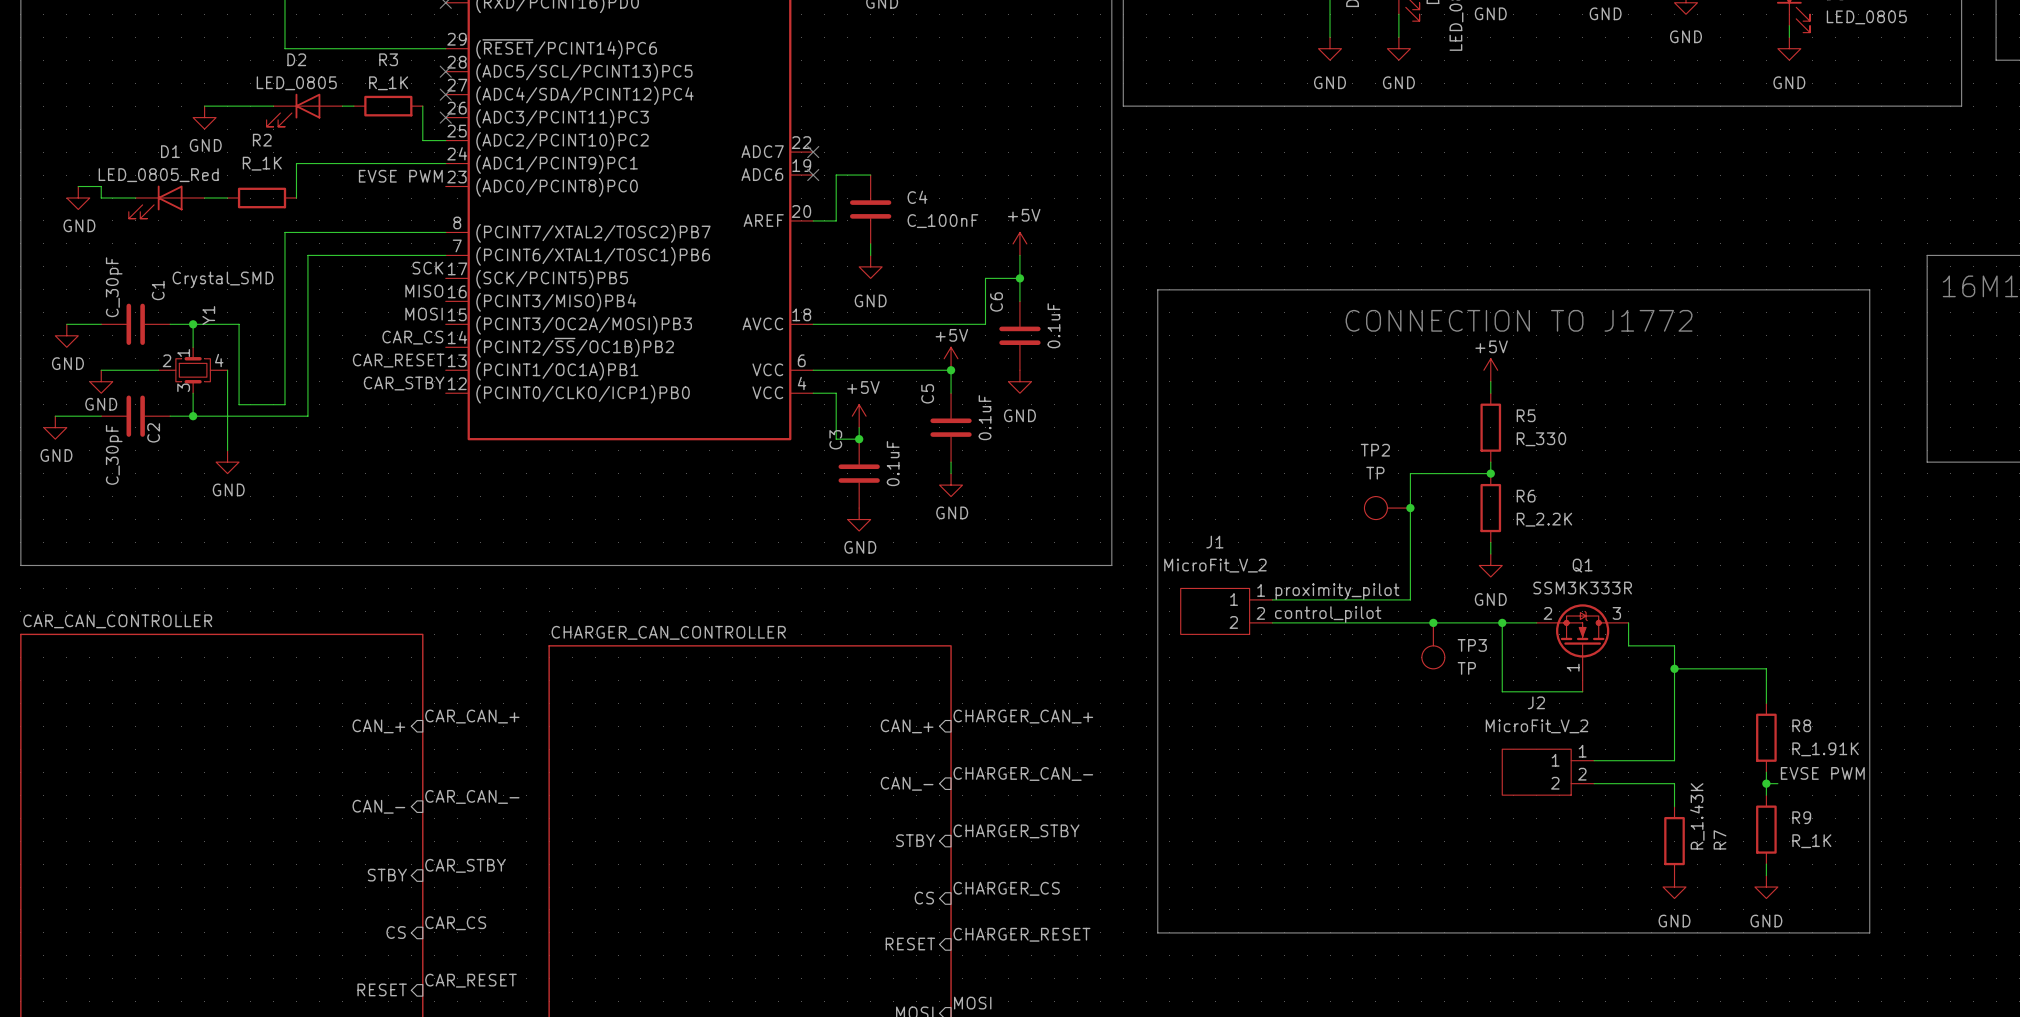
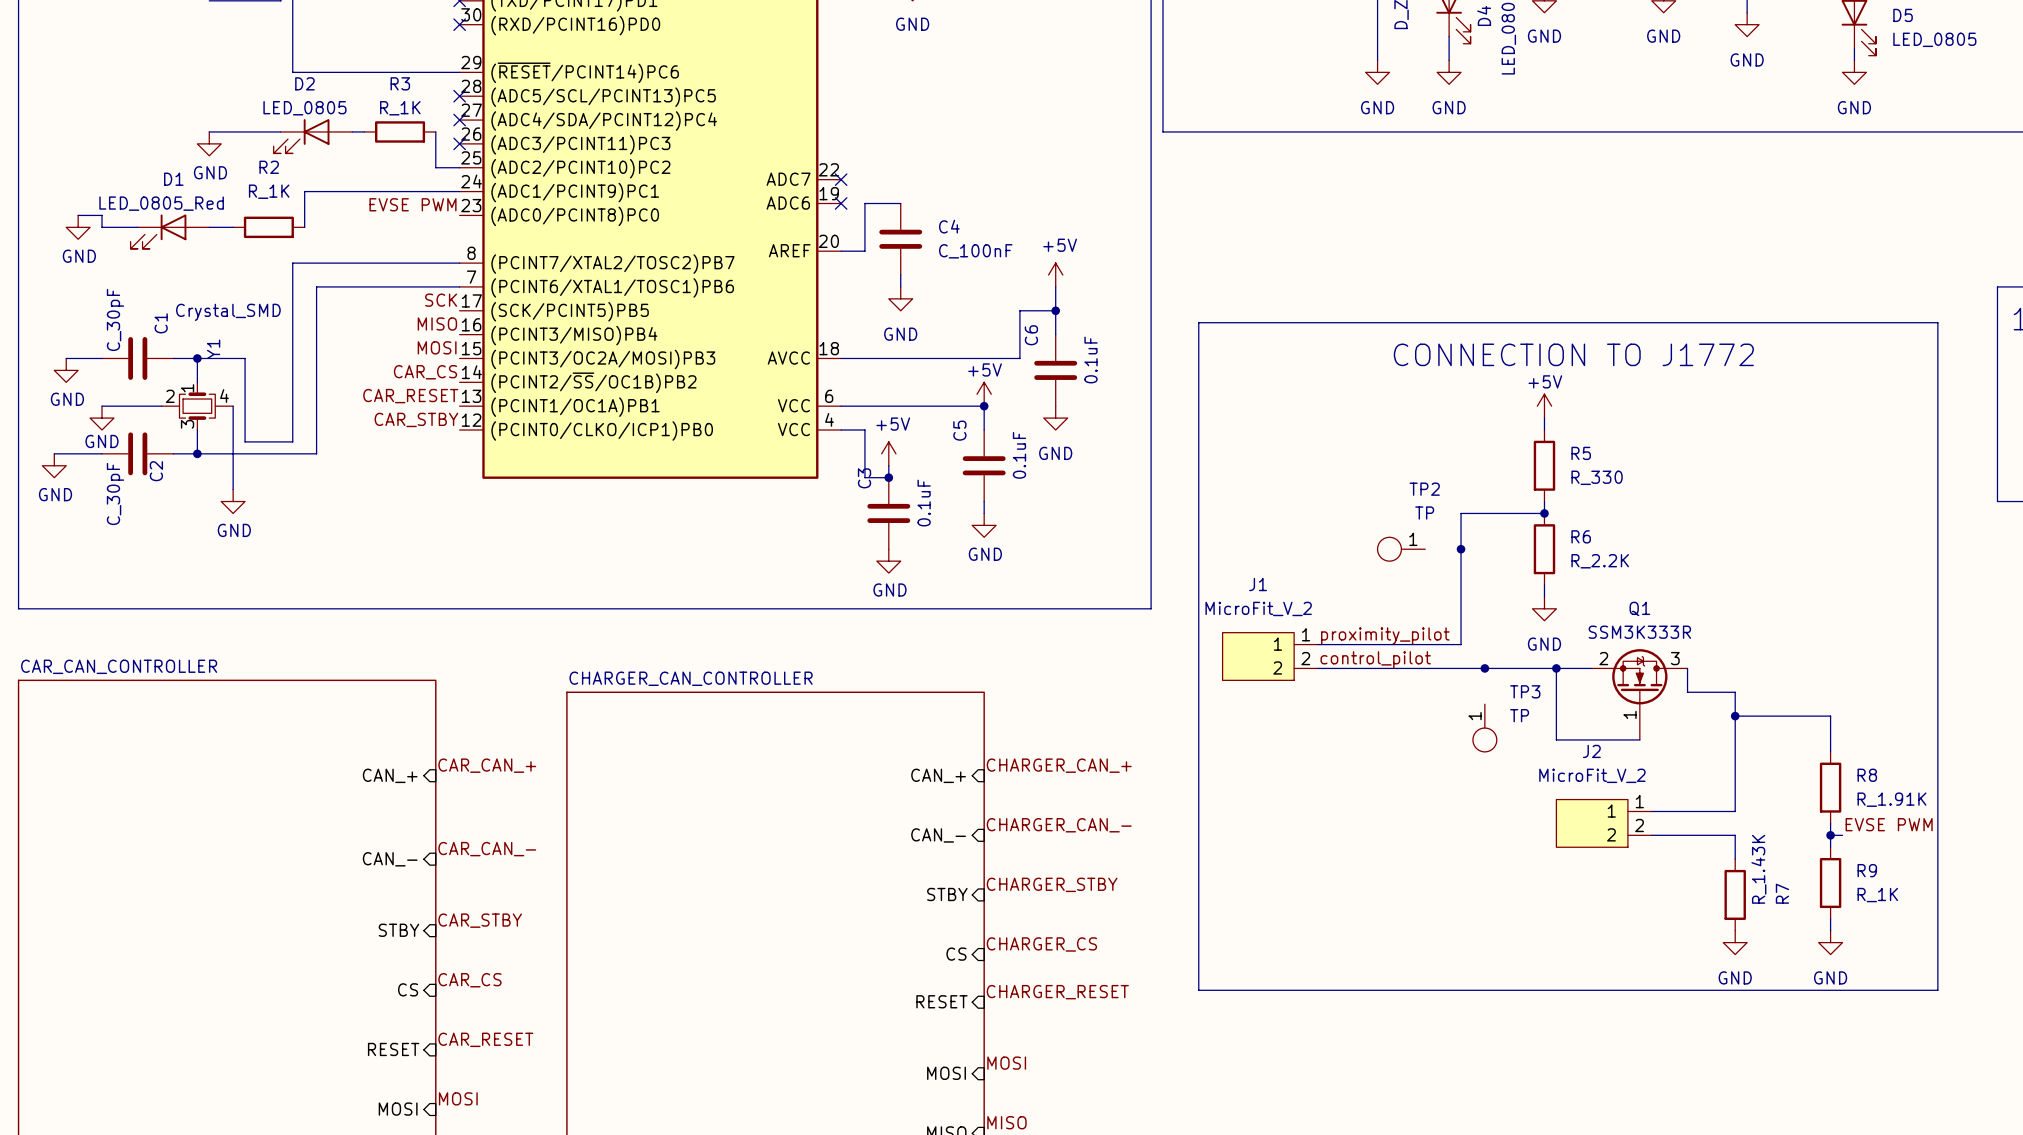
TP2 pin number: none -> 1 (1413, 539)
TP2 position: (1387, 508) -> (1401, 549)
TP3 position: (1433, 645) -> (1484, 728)
TP3 pin number: none -> 1 (1475, 716)

